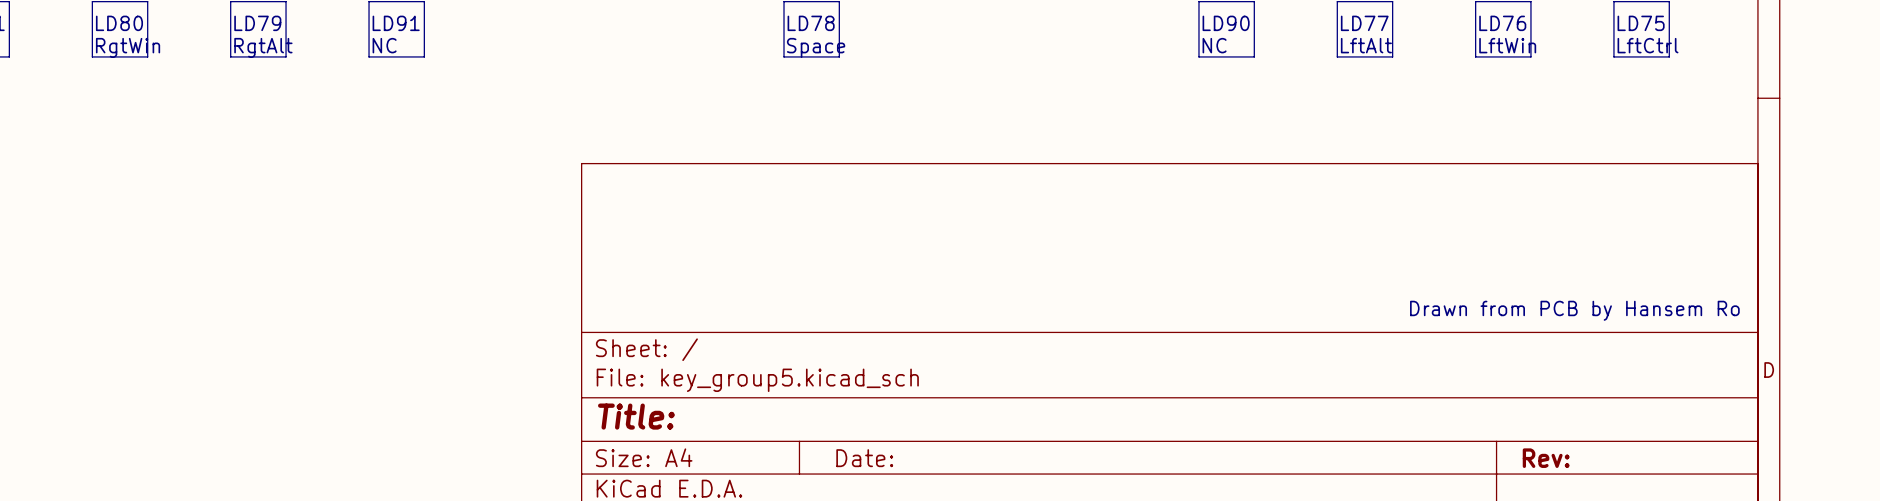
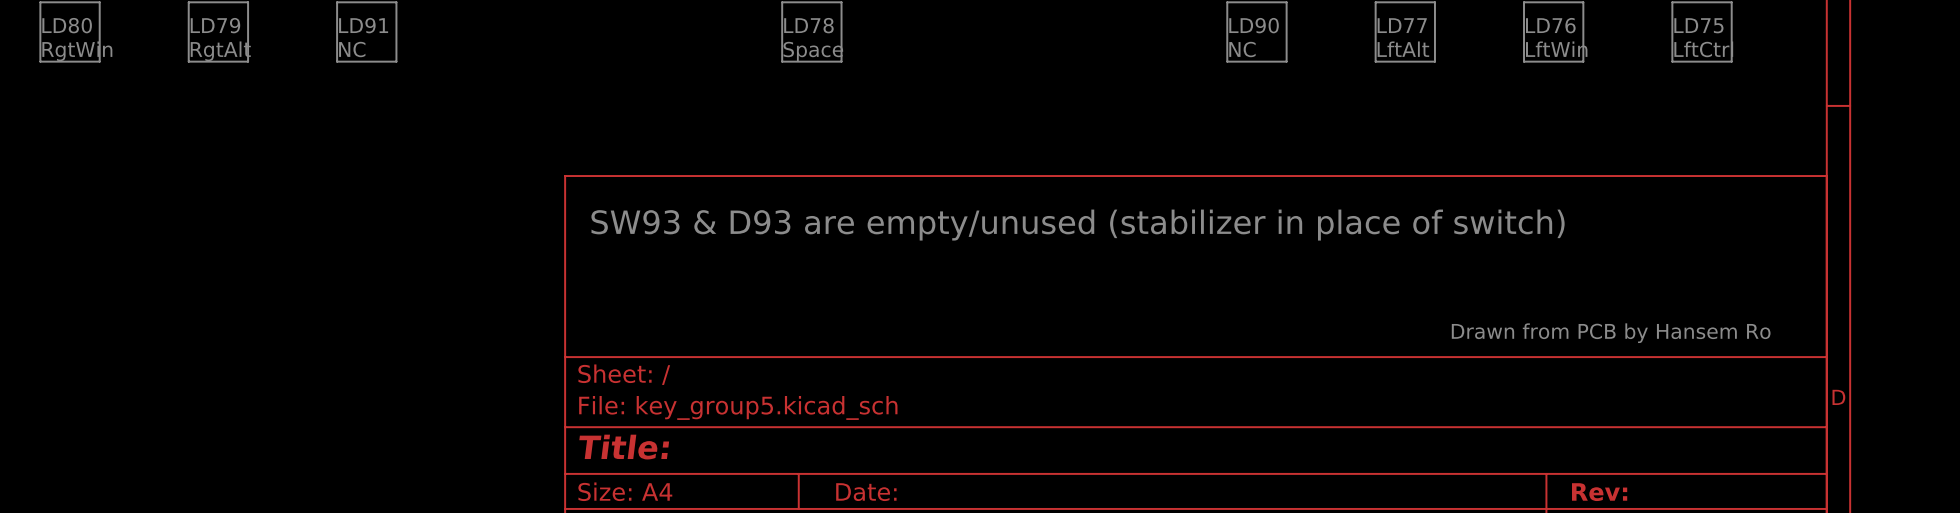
text: none -> SW93 & D93 are empty/unused (stabilizer in place of switch) (1078, 225)

